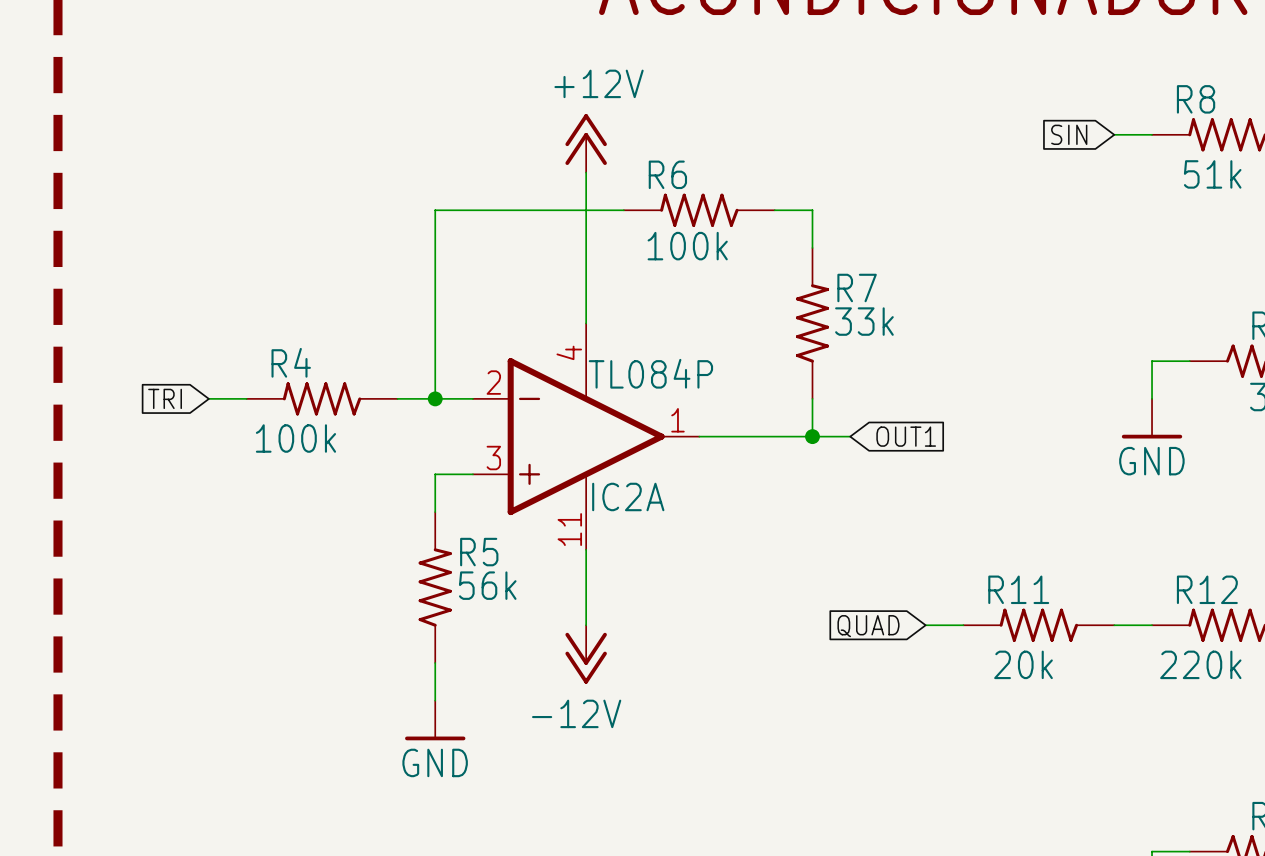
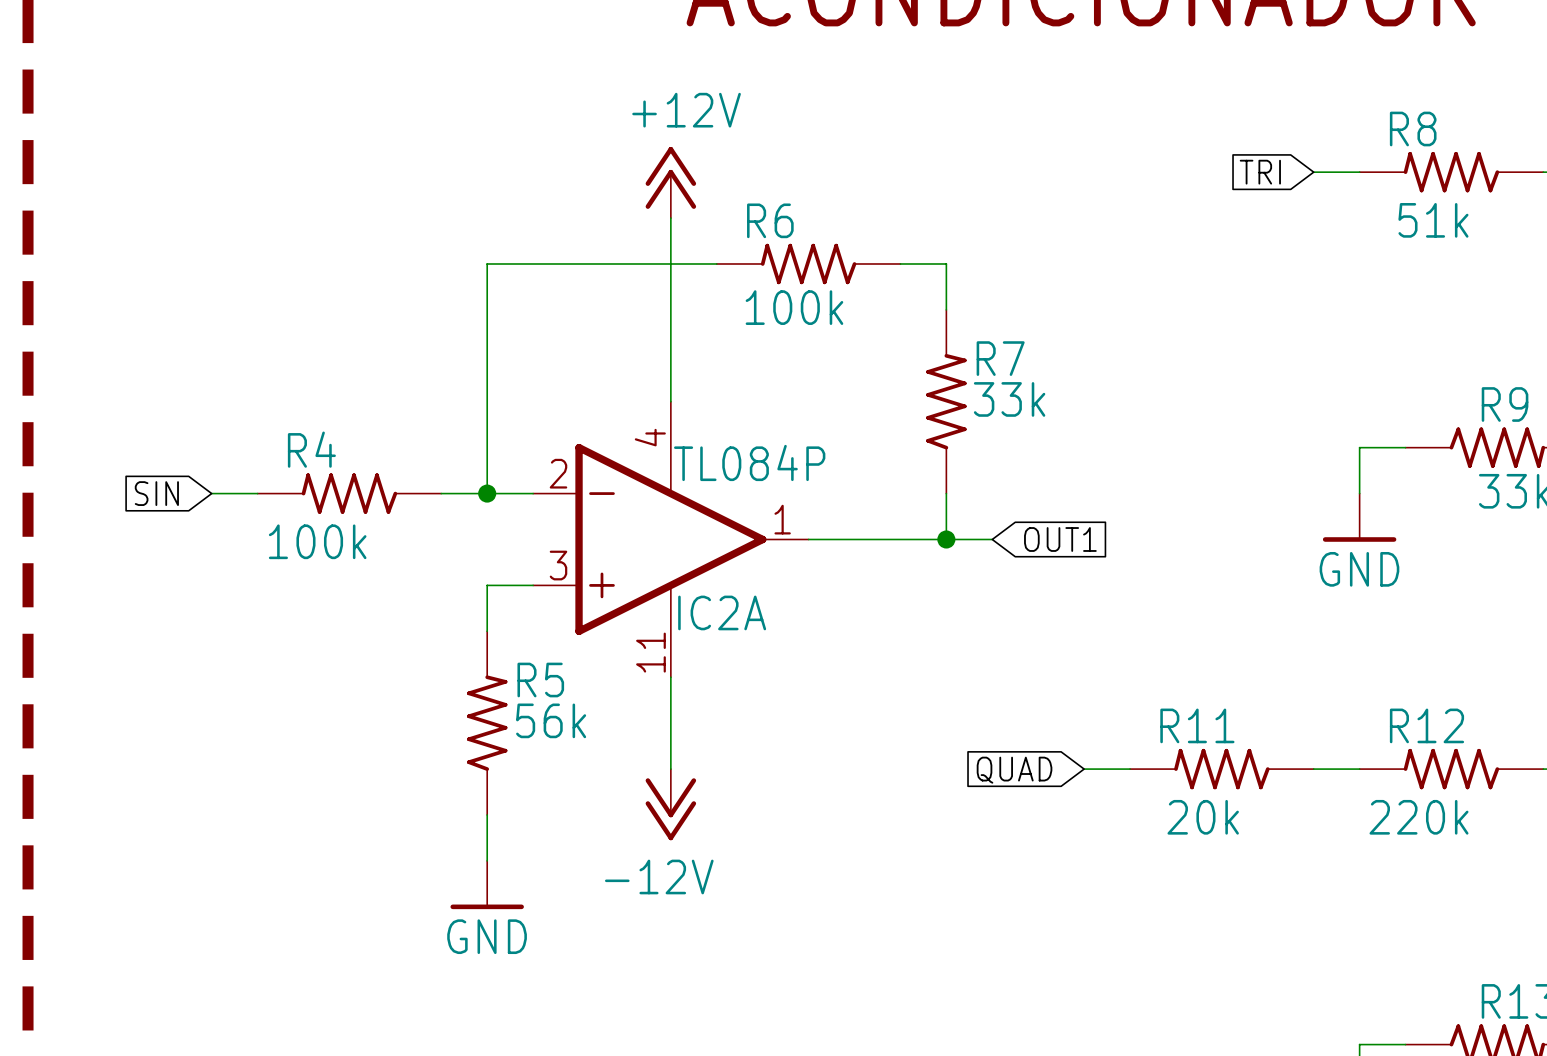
global label: SIN (1069, 134) -> TRI (1260, 172)
global label: TRI (165, 398) -> SIN (156, 493)

